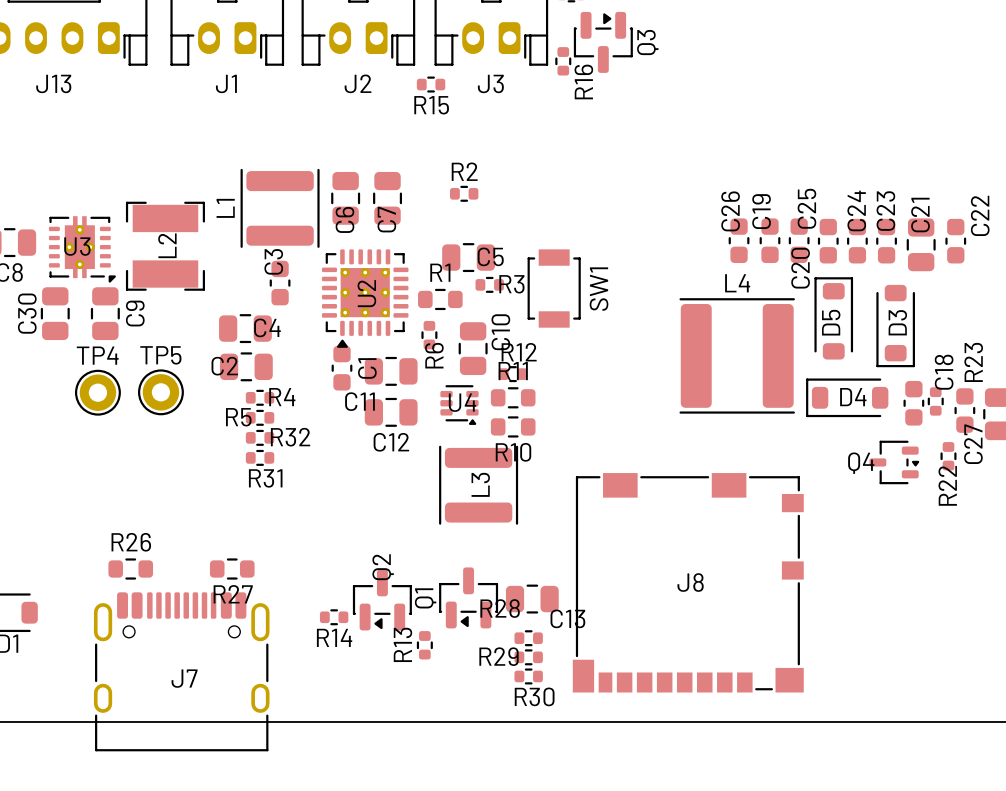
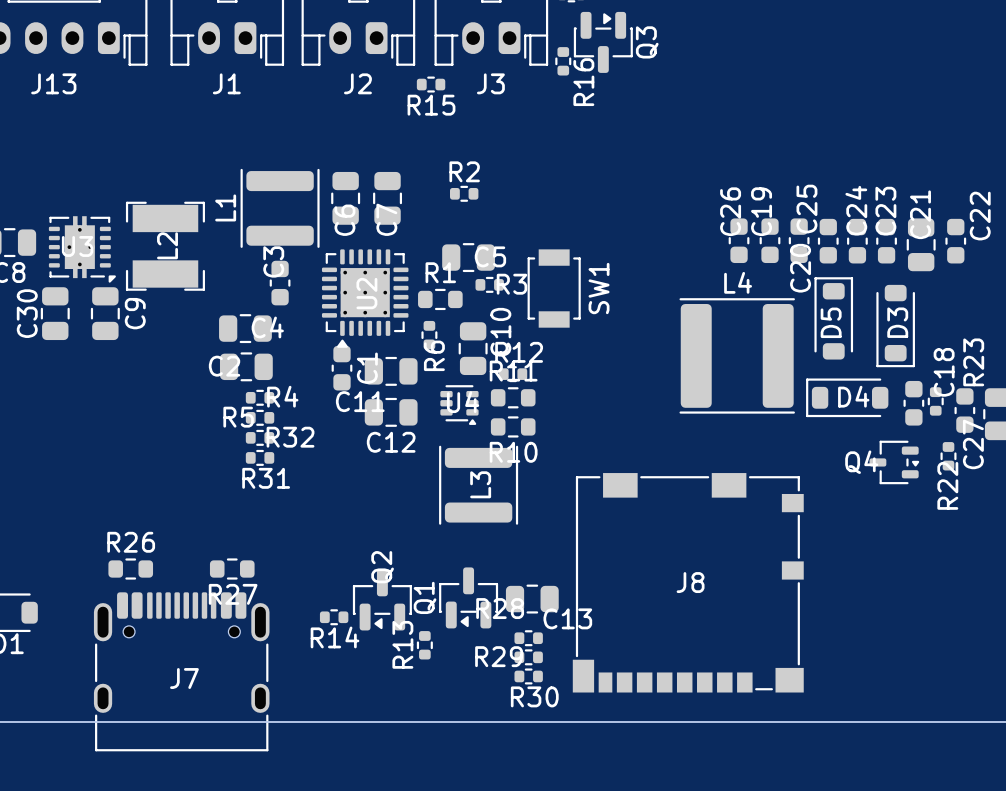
TP4: (97, 392) -> none
TP5: (160, 392) -> none

